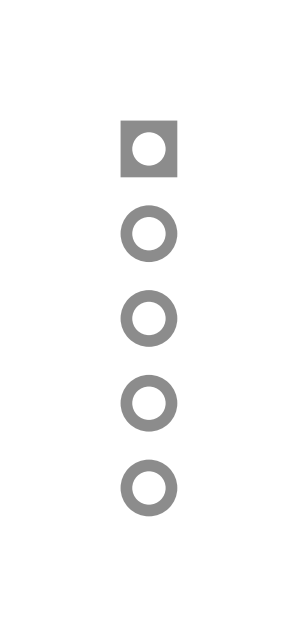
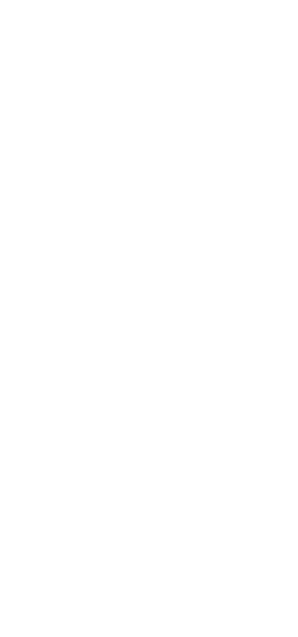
part: (148, 318) -> none

